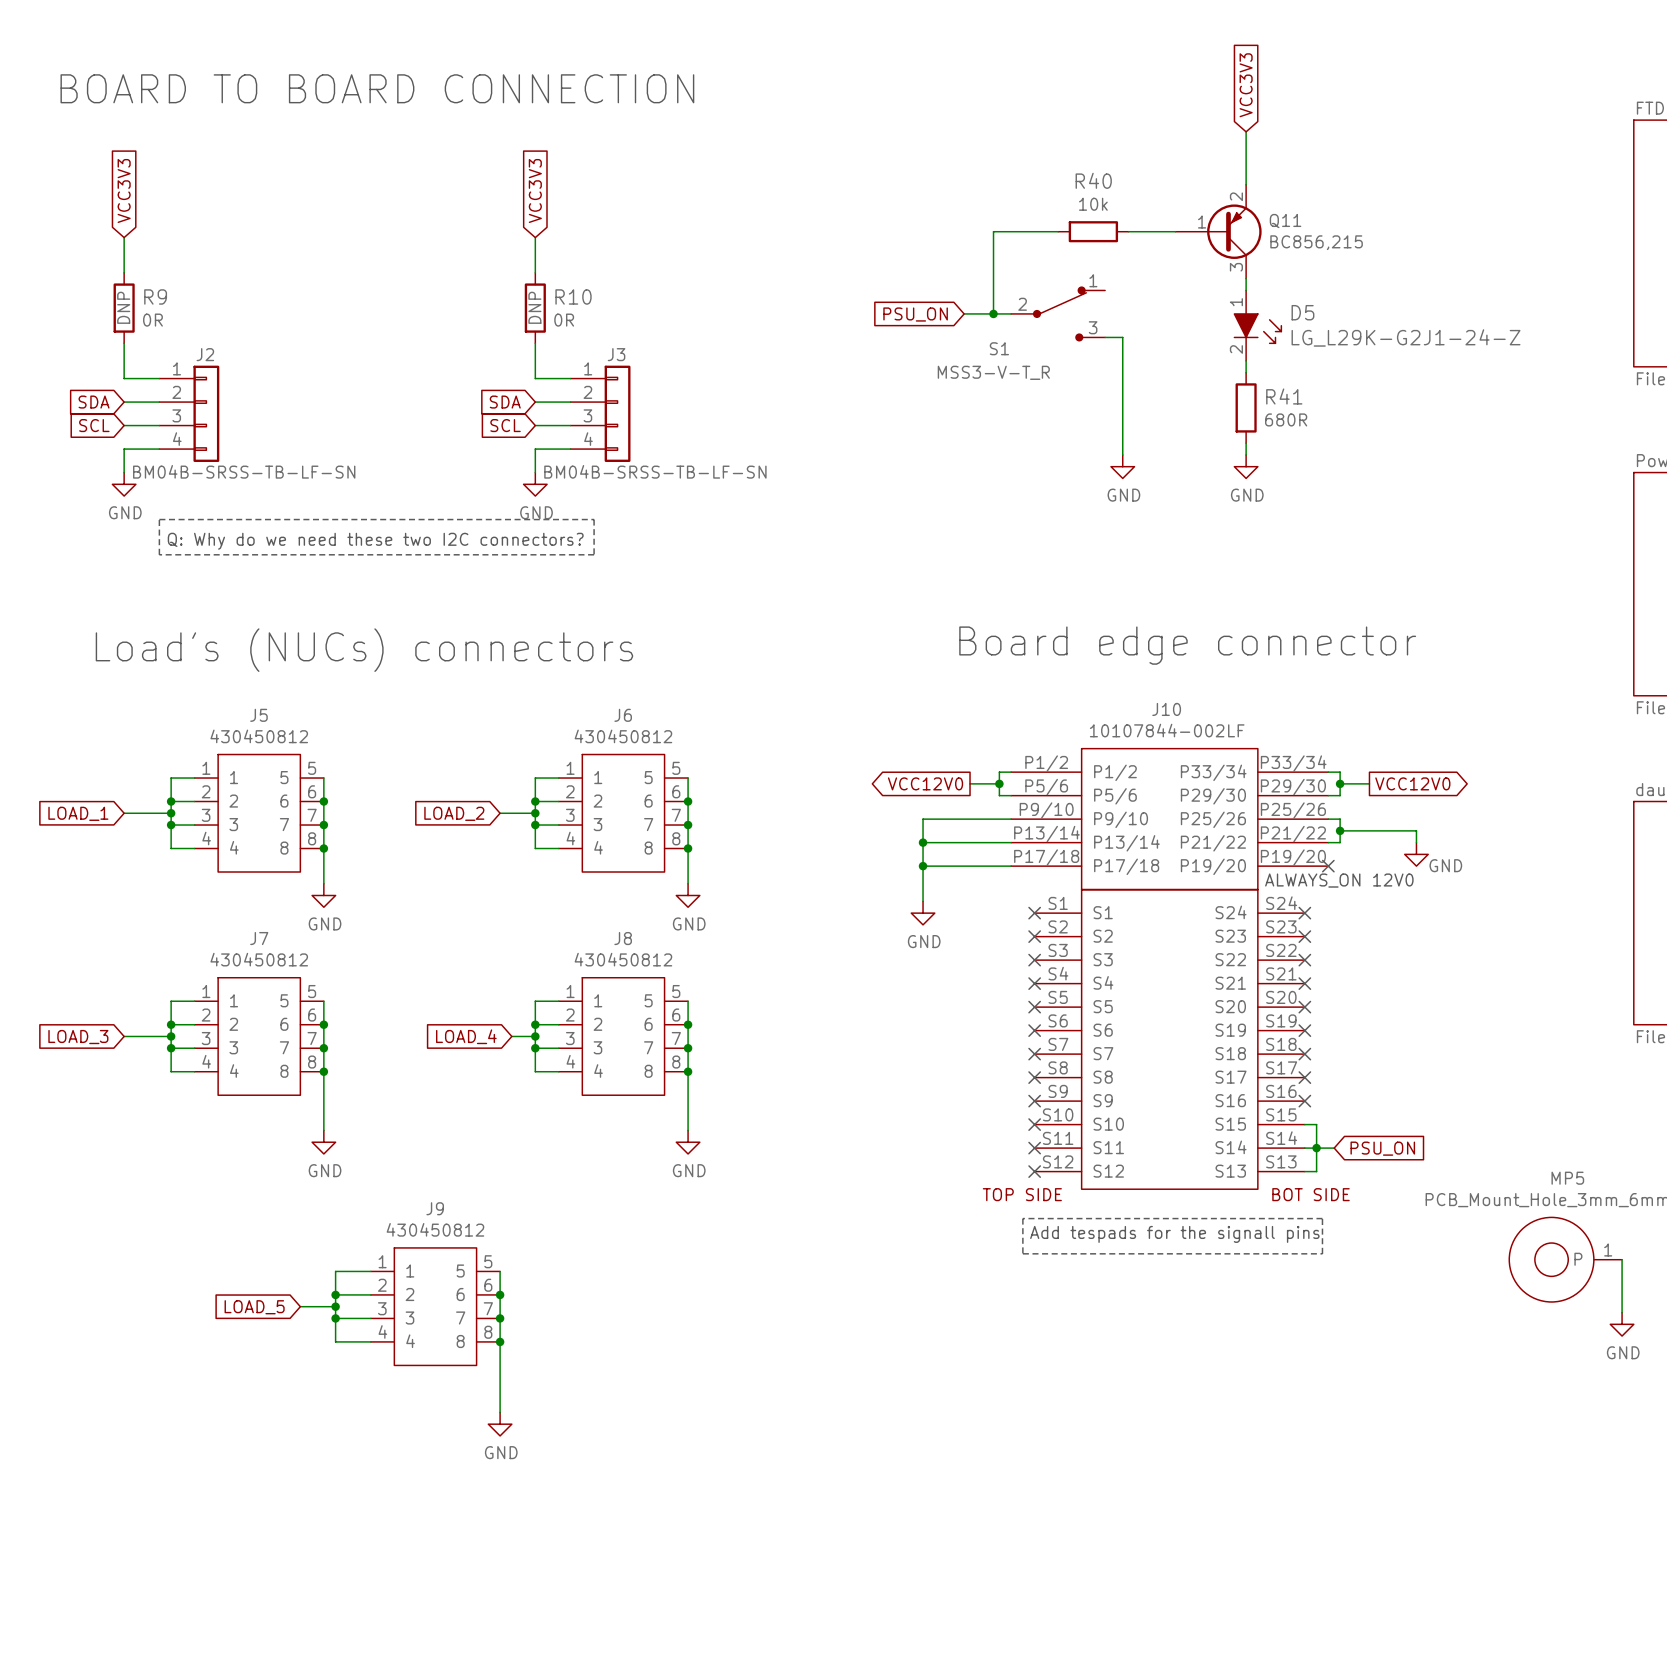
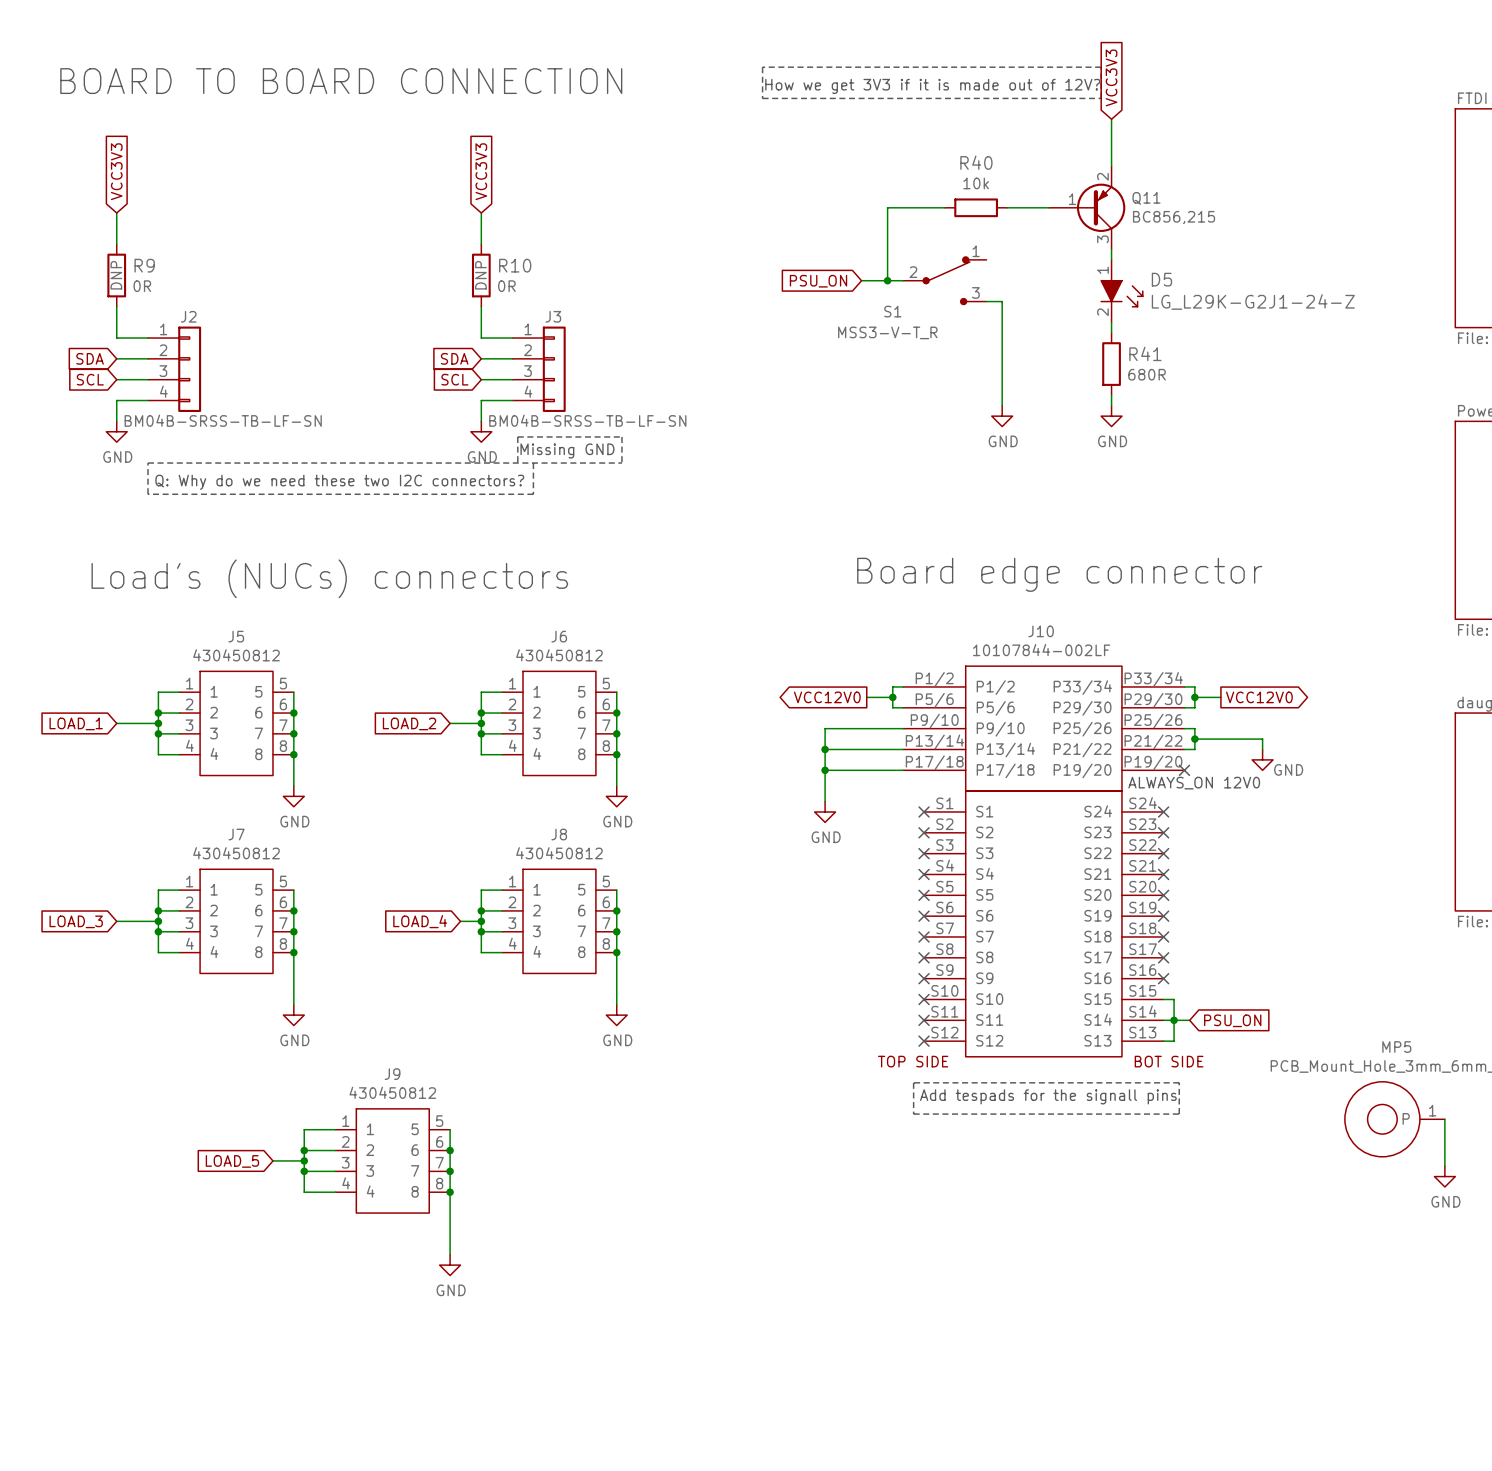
line: none -> (762, 67) (762, 98) (1101, 98) (1101, 67) (762, 67)
text: none -> How we get 3V3 if it is made out of 12V? (932, 86)
text: none -> Missing GND (567, 451)
line: none -> (517, 463) (517, 436) (621, 436) (621, 463) (533, 463)

